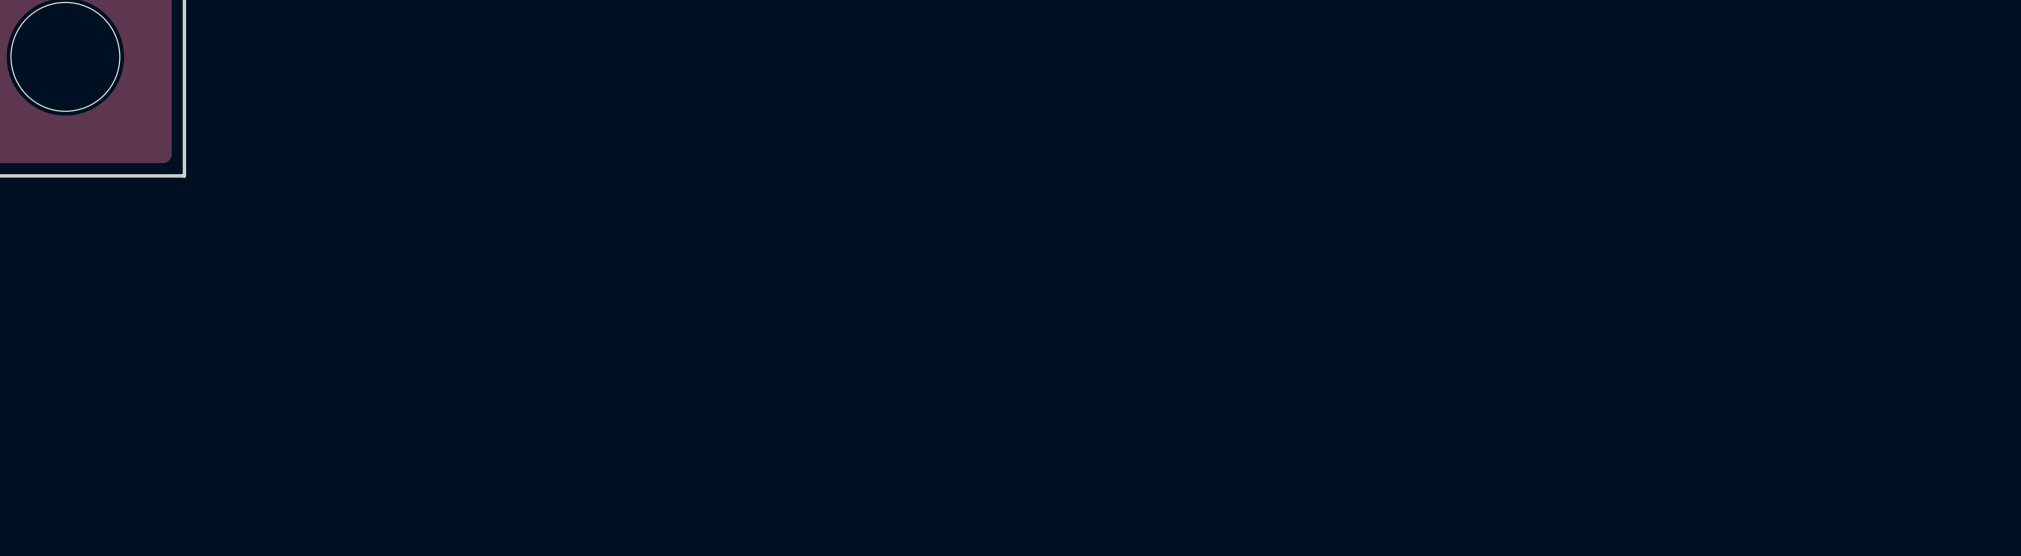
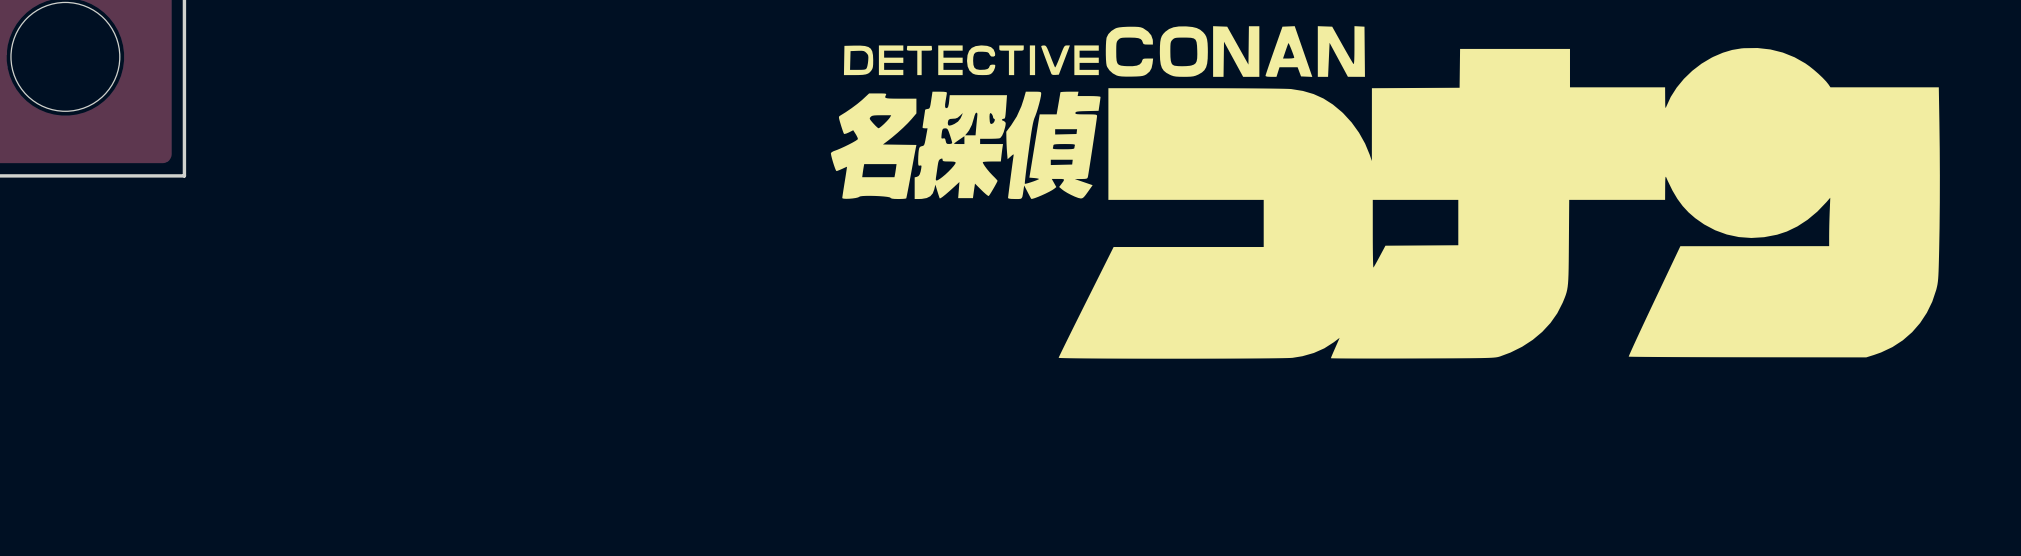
drawing: none -> [830, 26, 1940, 359]

